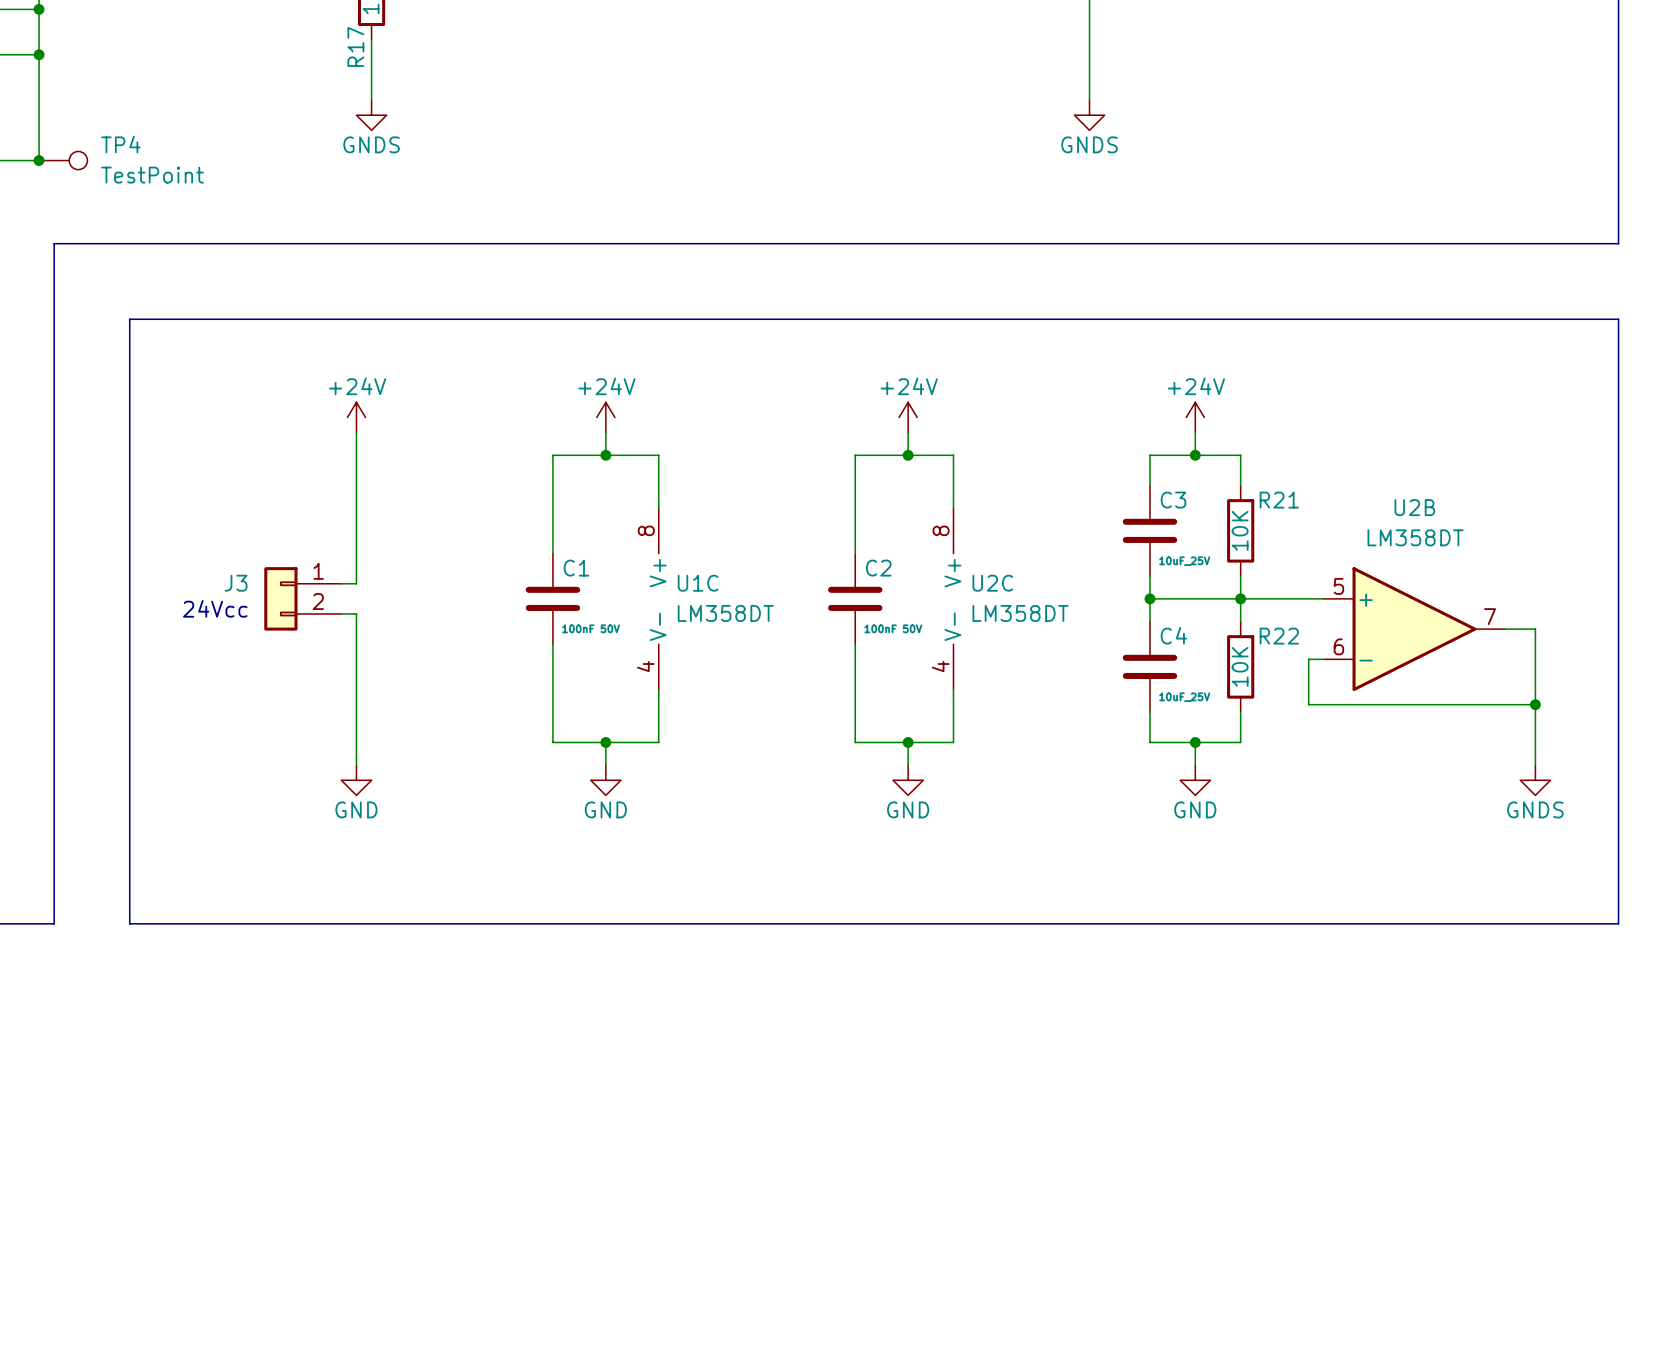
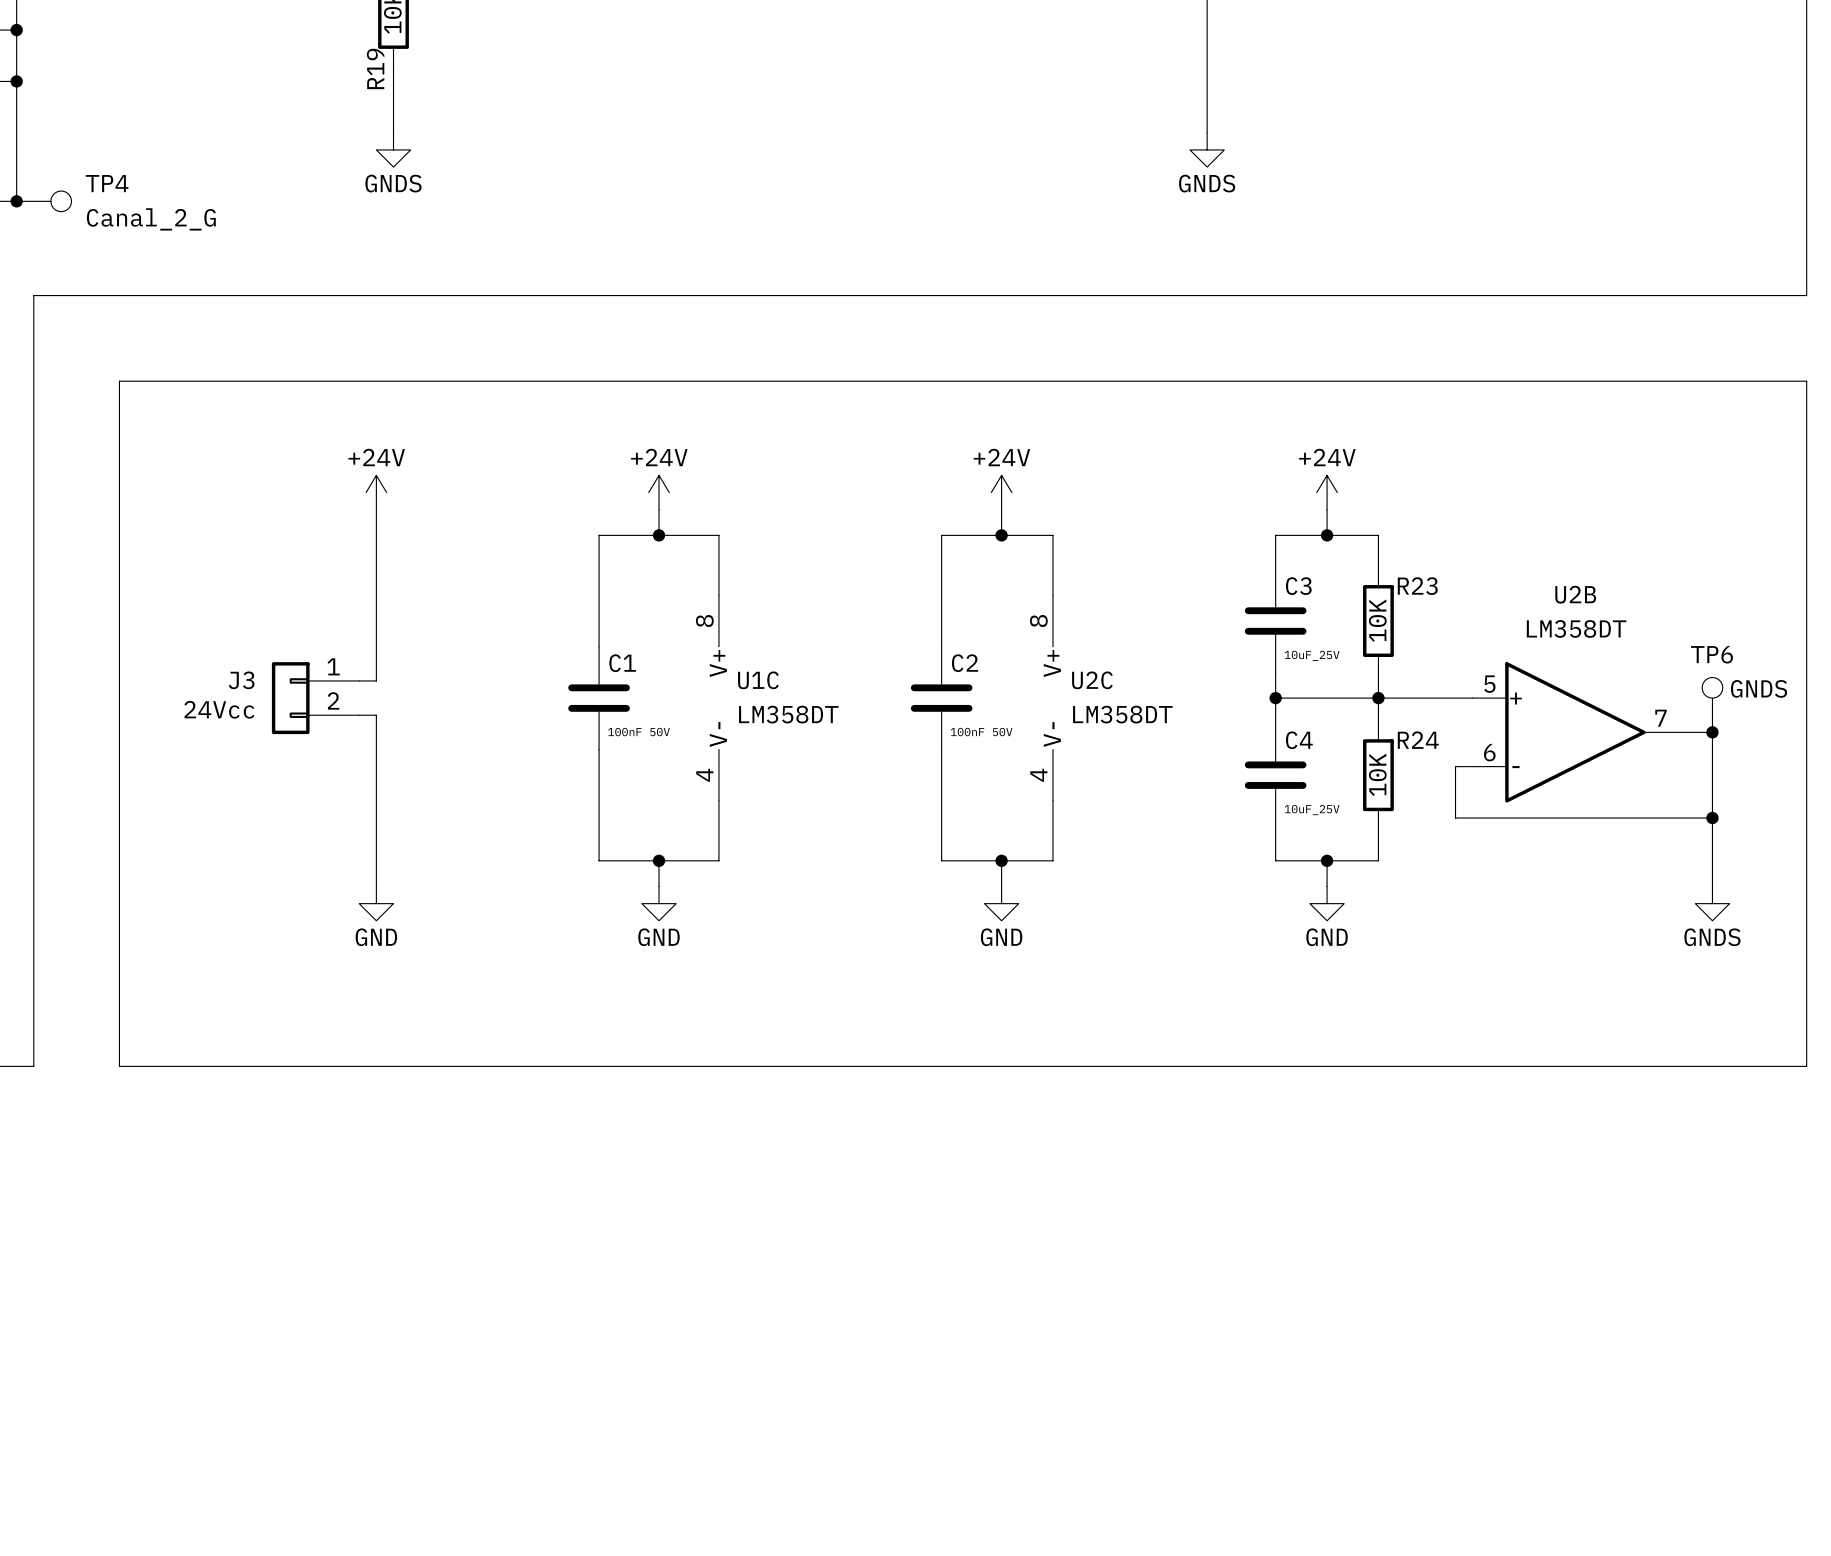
R17 name: R17 (355, 46) -> R19 (375, 68)
TP4 value: TestPoint (152, 175) -> Canal_2_G (151, 219)
R21 name: R21 (1279, 500) -> R23 (1417, 586)
TP6: none -> GNDS (1712, 704)
junction: none -> (1712, 732)
R22 name: R22 (1279, 636) -> R24 (1418, 740)

